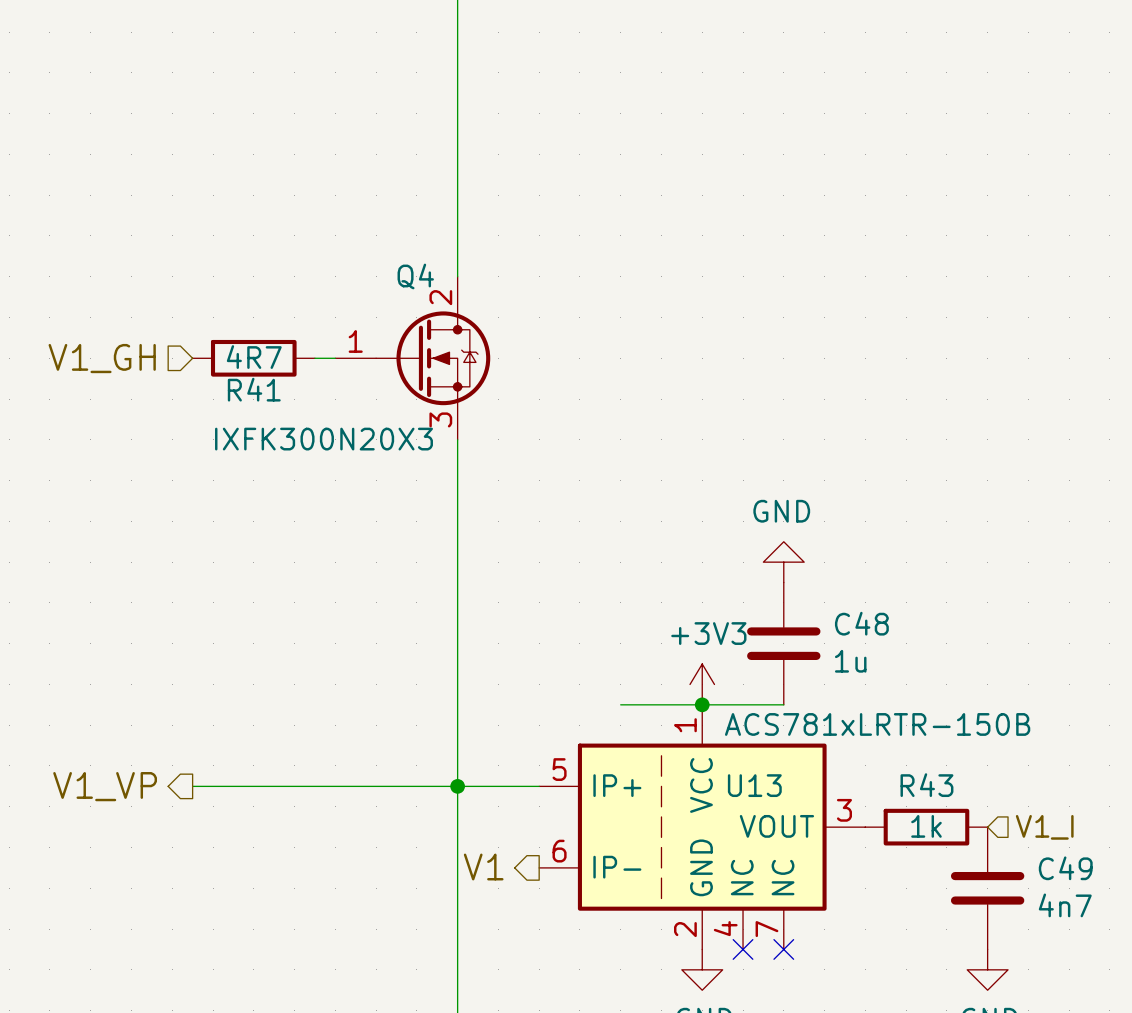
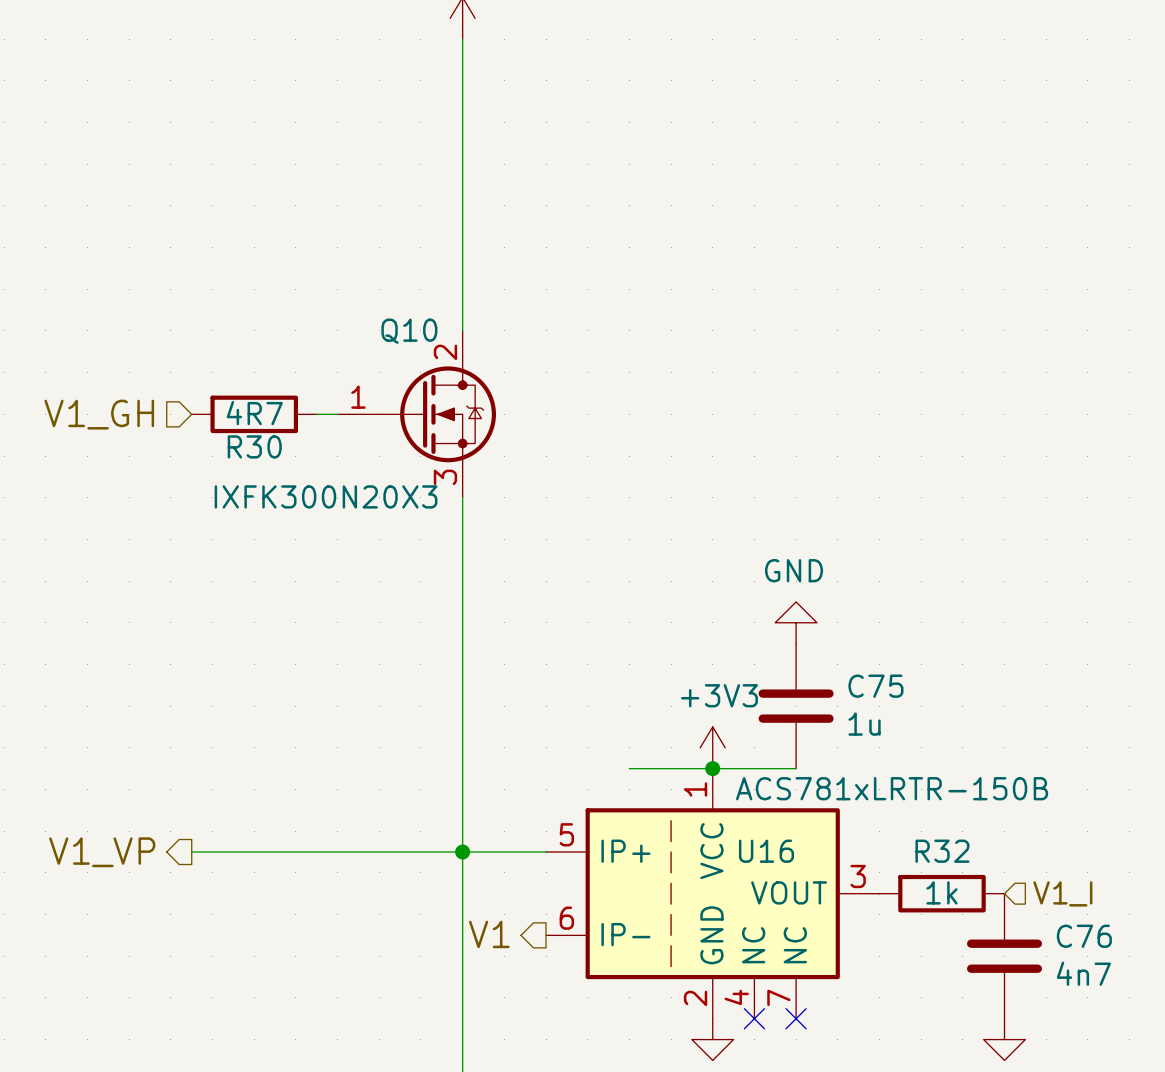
Q4 name: Q4 (415, 276) -> Q10 (409, 331)
R41 name: R41 (254, 389) -> R30 (254, 446)
C48 name: C48 (861, 623) -> C75 (875, 686)
U13 name: U13 (754, 785) -> U16 (766, 851)
R43 name: R43 (926, 785) -> R32 (942, 851)
C49 name: C49 (1065, 868) -> C76 (1084, 936)

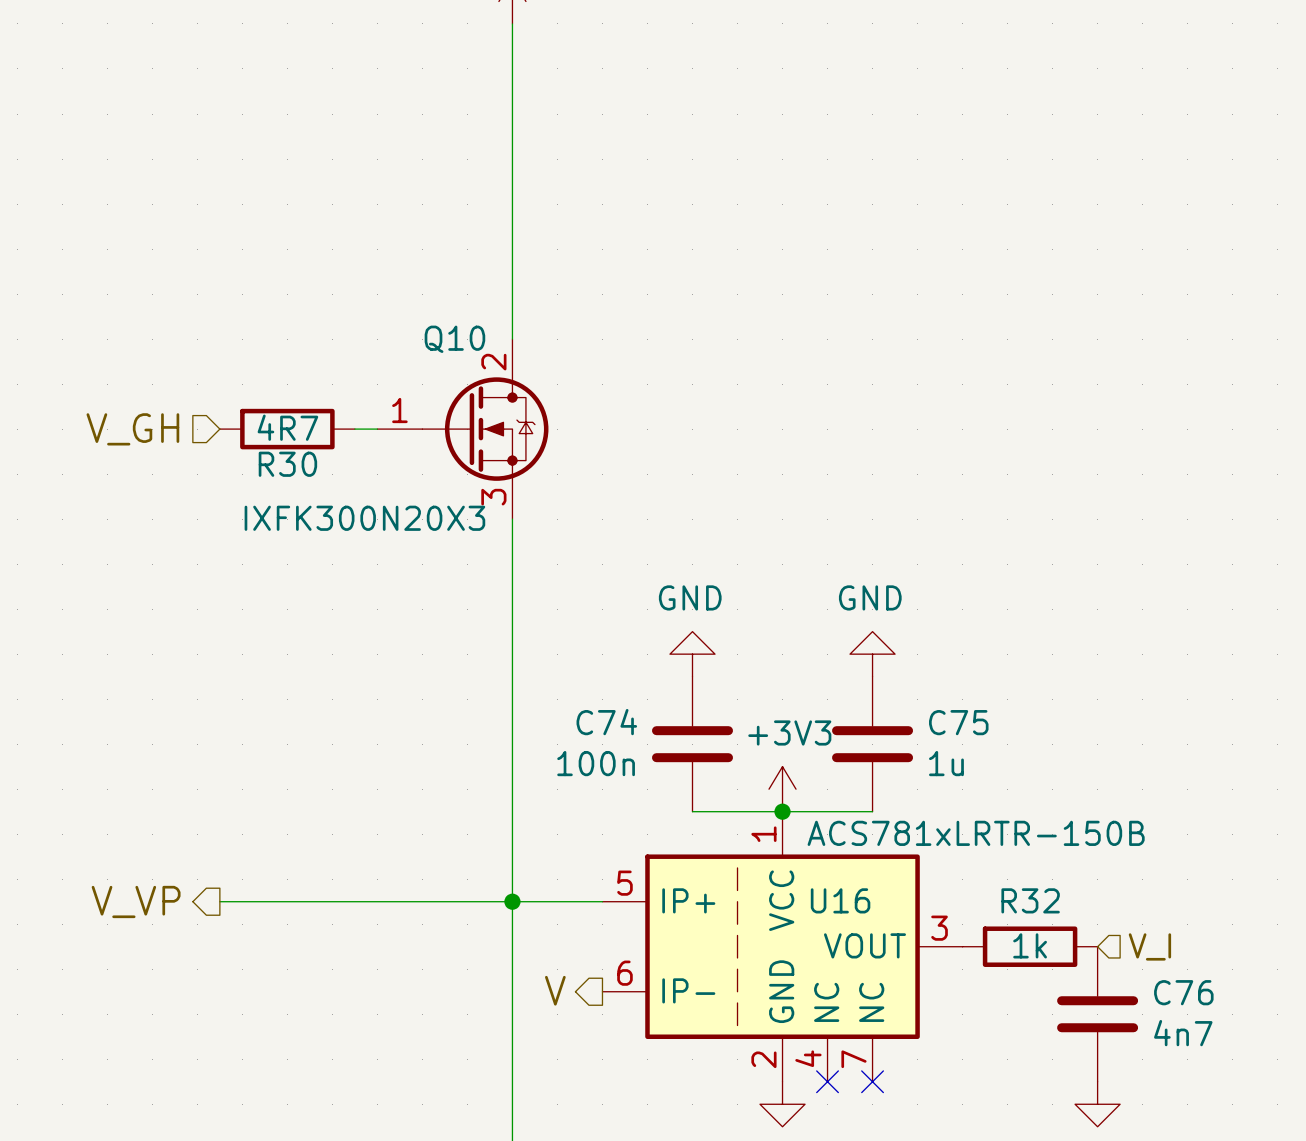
hierarchical label: V1_GH (99, 414) -> V_GH (132, 429)
power symbol: none -> GND (692, 654)
C74: none -> 100n (692, 744)
hierarchical label: V1_VP (102, 852) -> V_VP (136, 901)
hierarchical label: V1_I (1062, 893) -> V_I (1149, 946)
hierarchical label: V1 (489, 934) -> V (555, 990)

